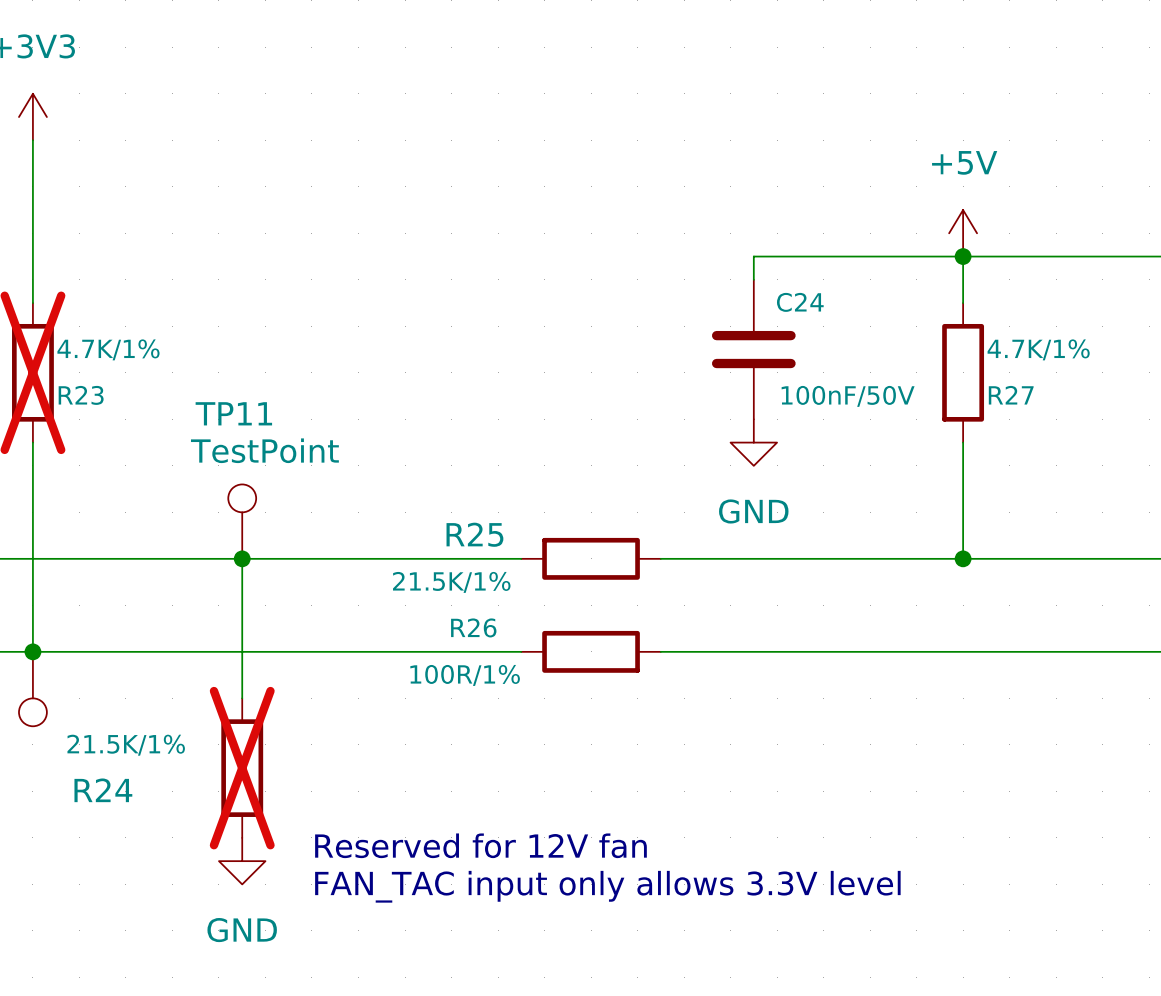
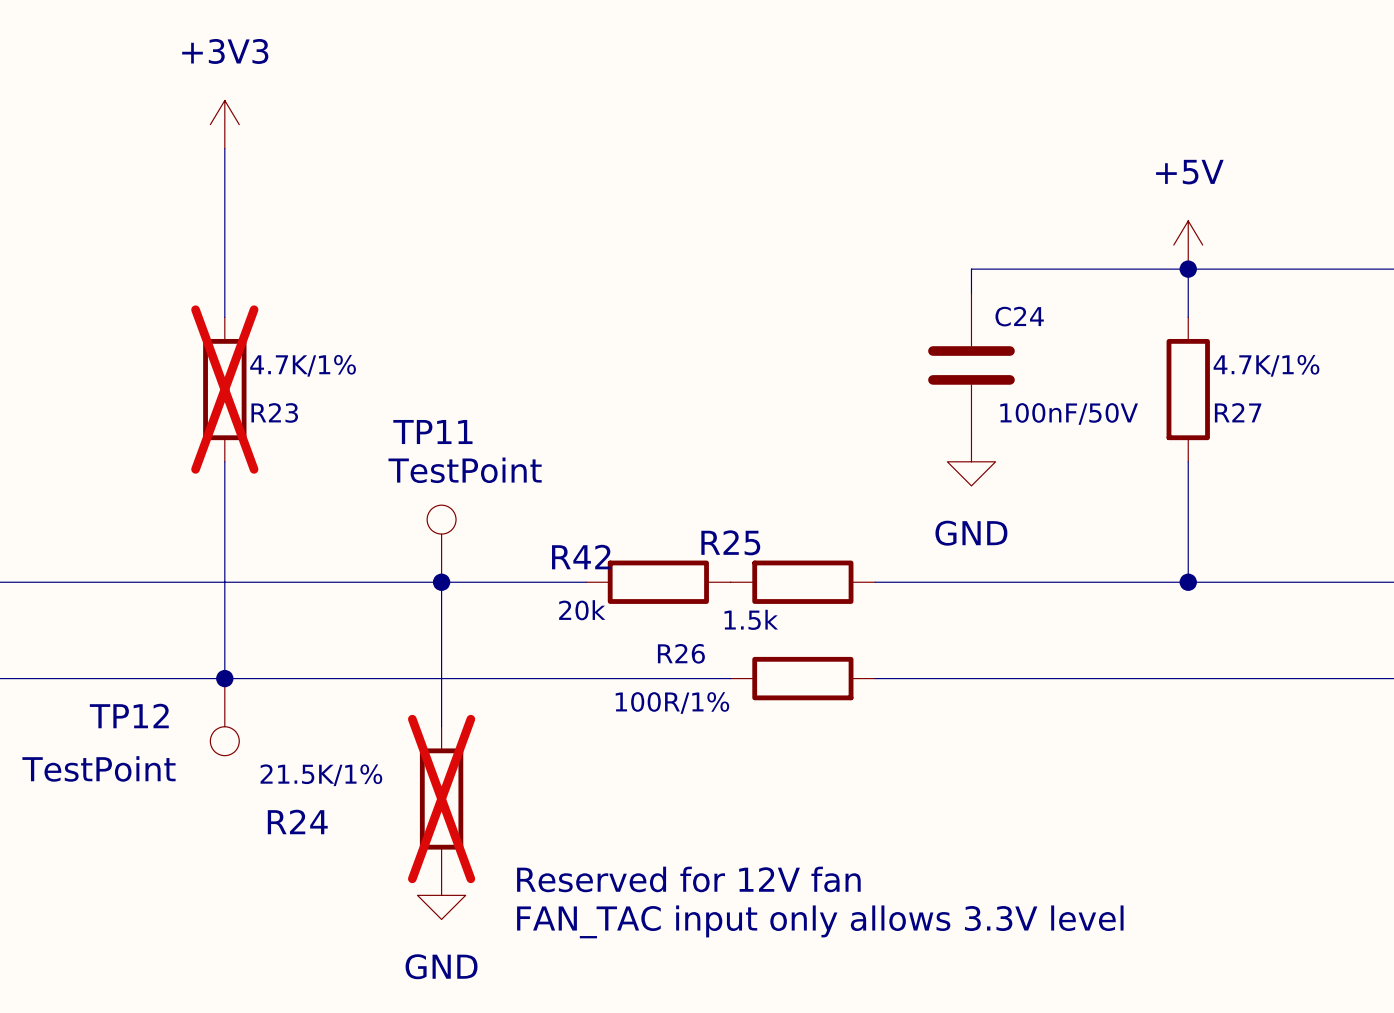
R25 name position: R25 (474, 534) -> R25 (730, 542)
wire: (381, 558) (521, 558) -> none
R42: none -> 20k (658, 582)
R25 value: 21.5K/1% (451, 582) -> 1.5k (751, 619)

